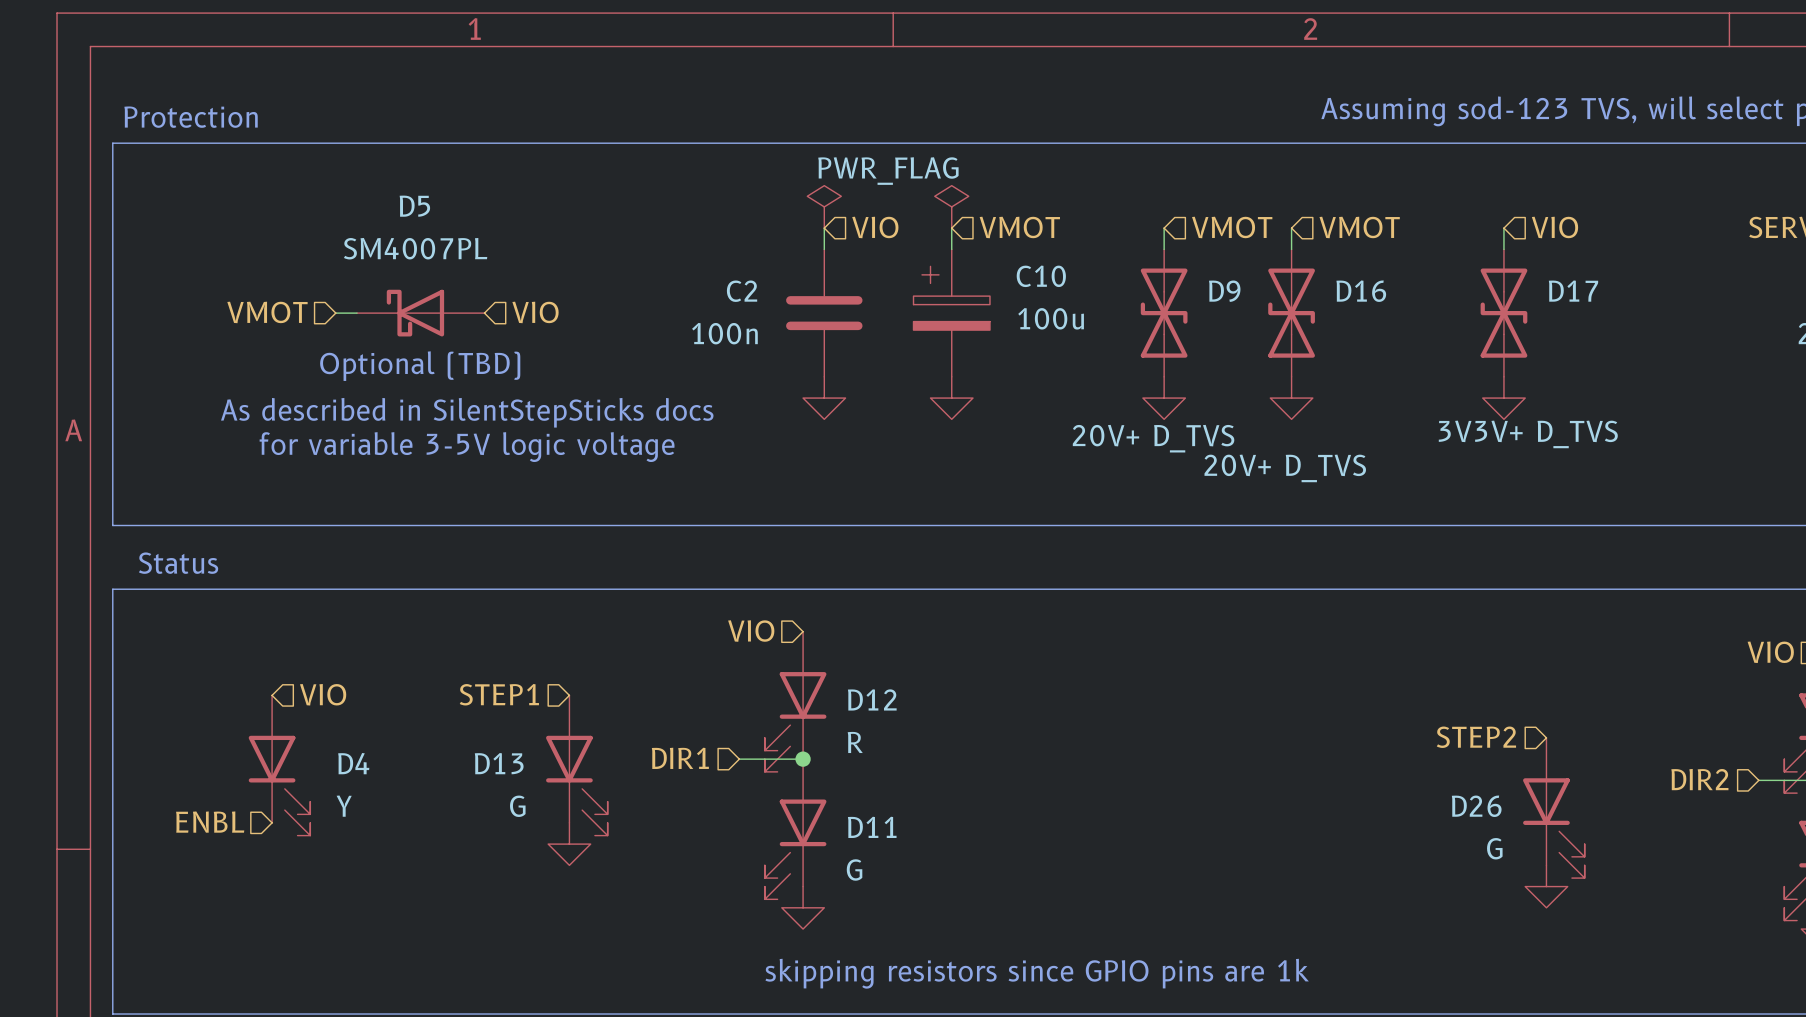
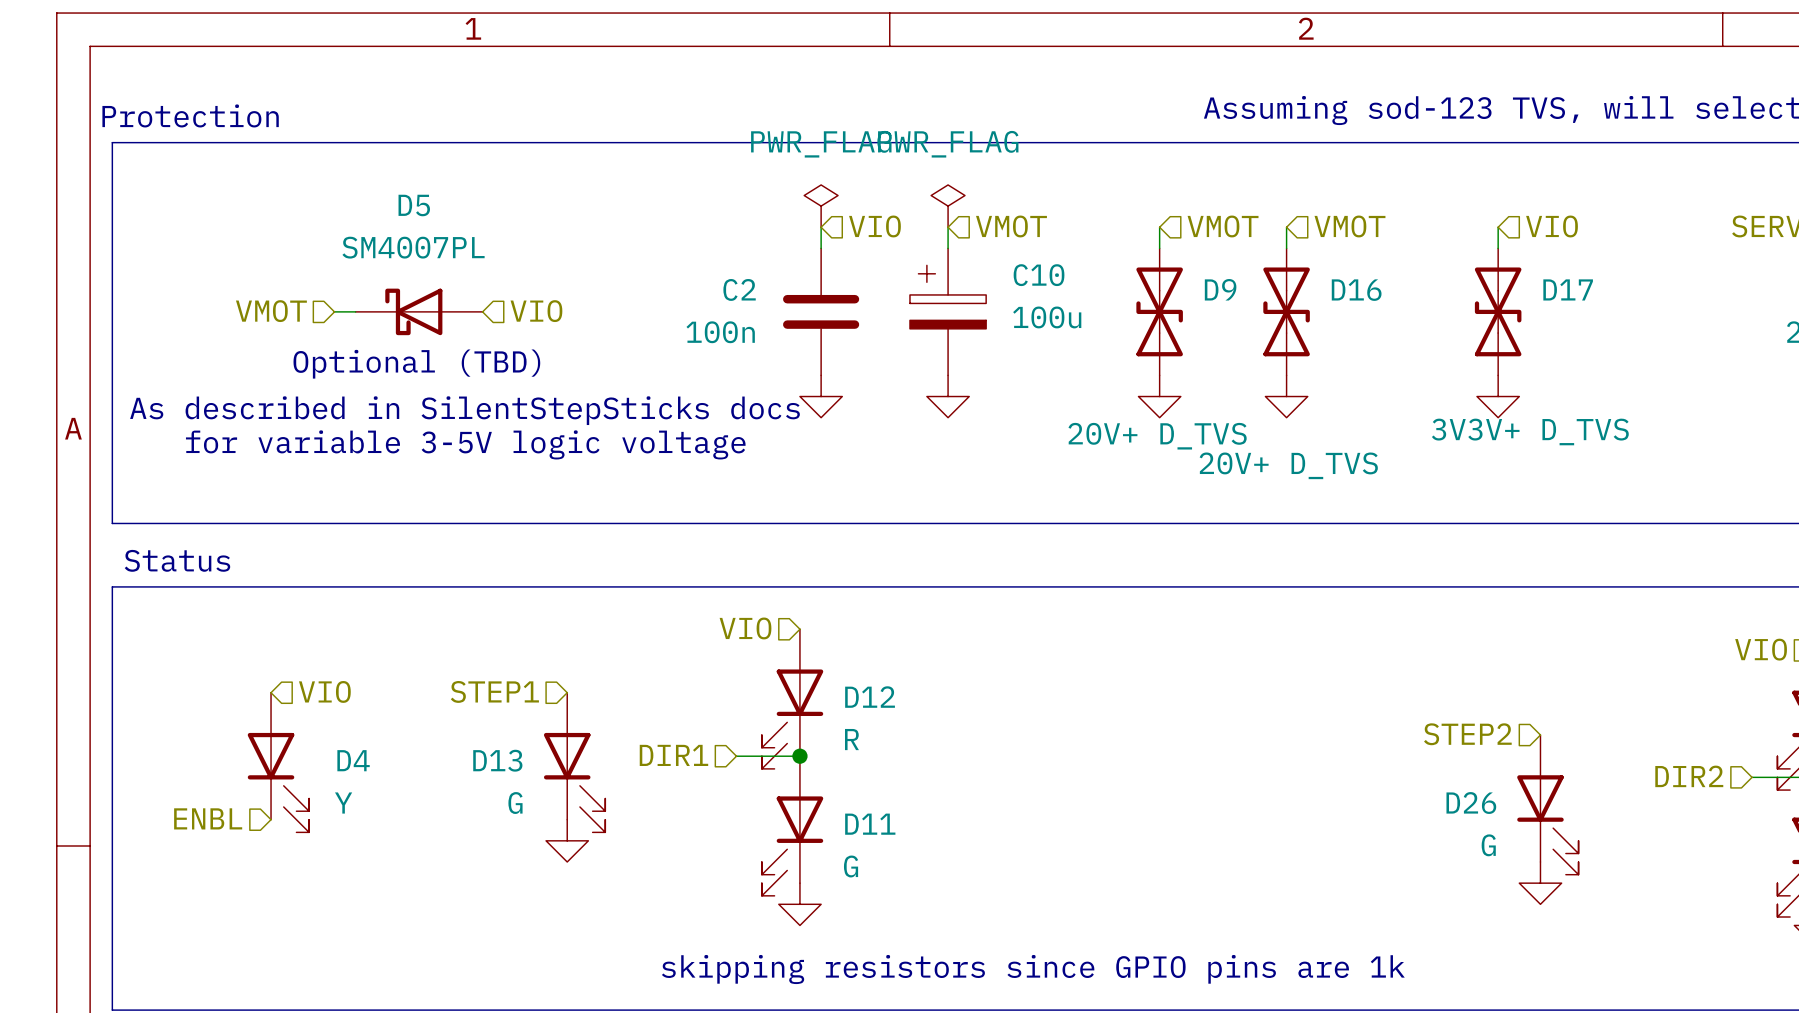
power symbol text: none -> PWR_FLAG (948, 144)
power symbol text position: PWR_FLAG (888, 171) -> PWR_FLAG (821, 144)

